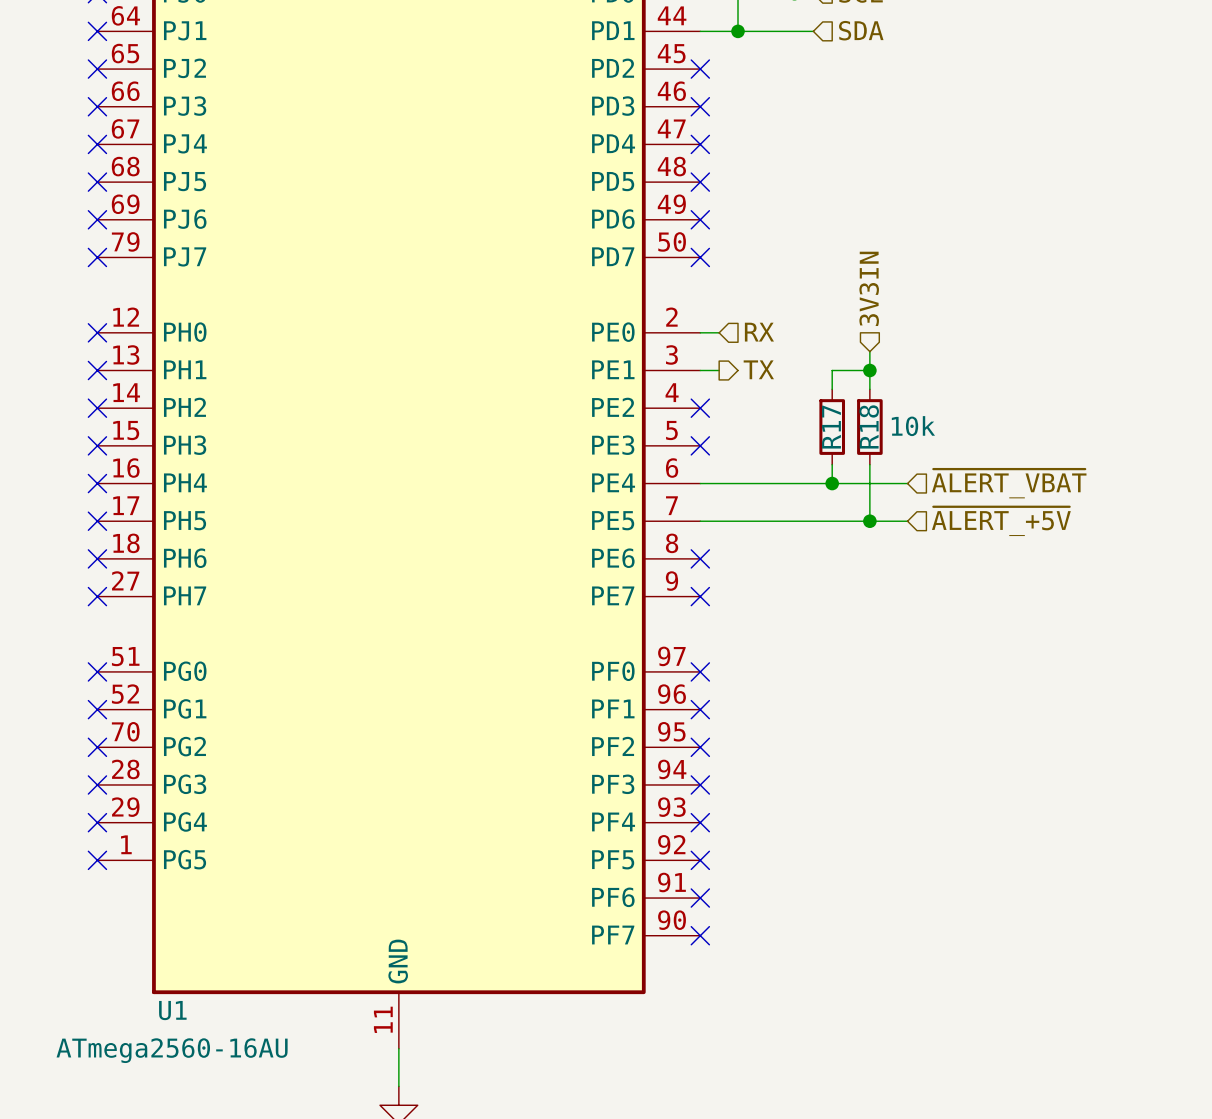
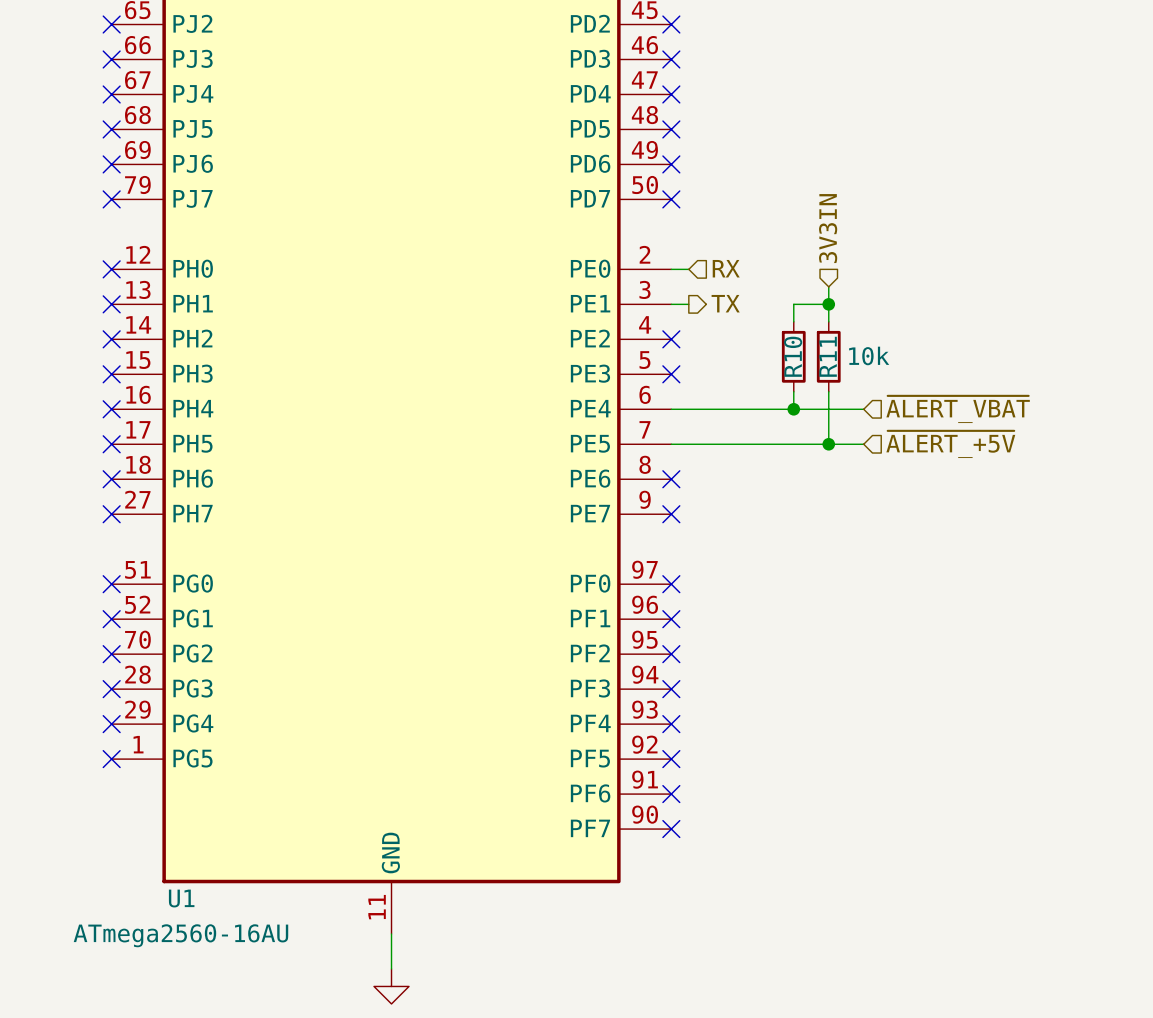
R18 name: R18 (869, 426) -> R11 (828, 356)
R17 name: R17 (831, 427) -> R10 (793, 356)

